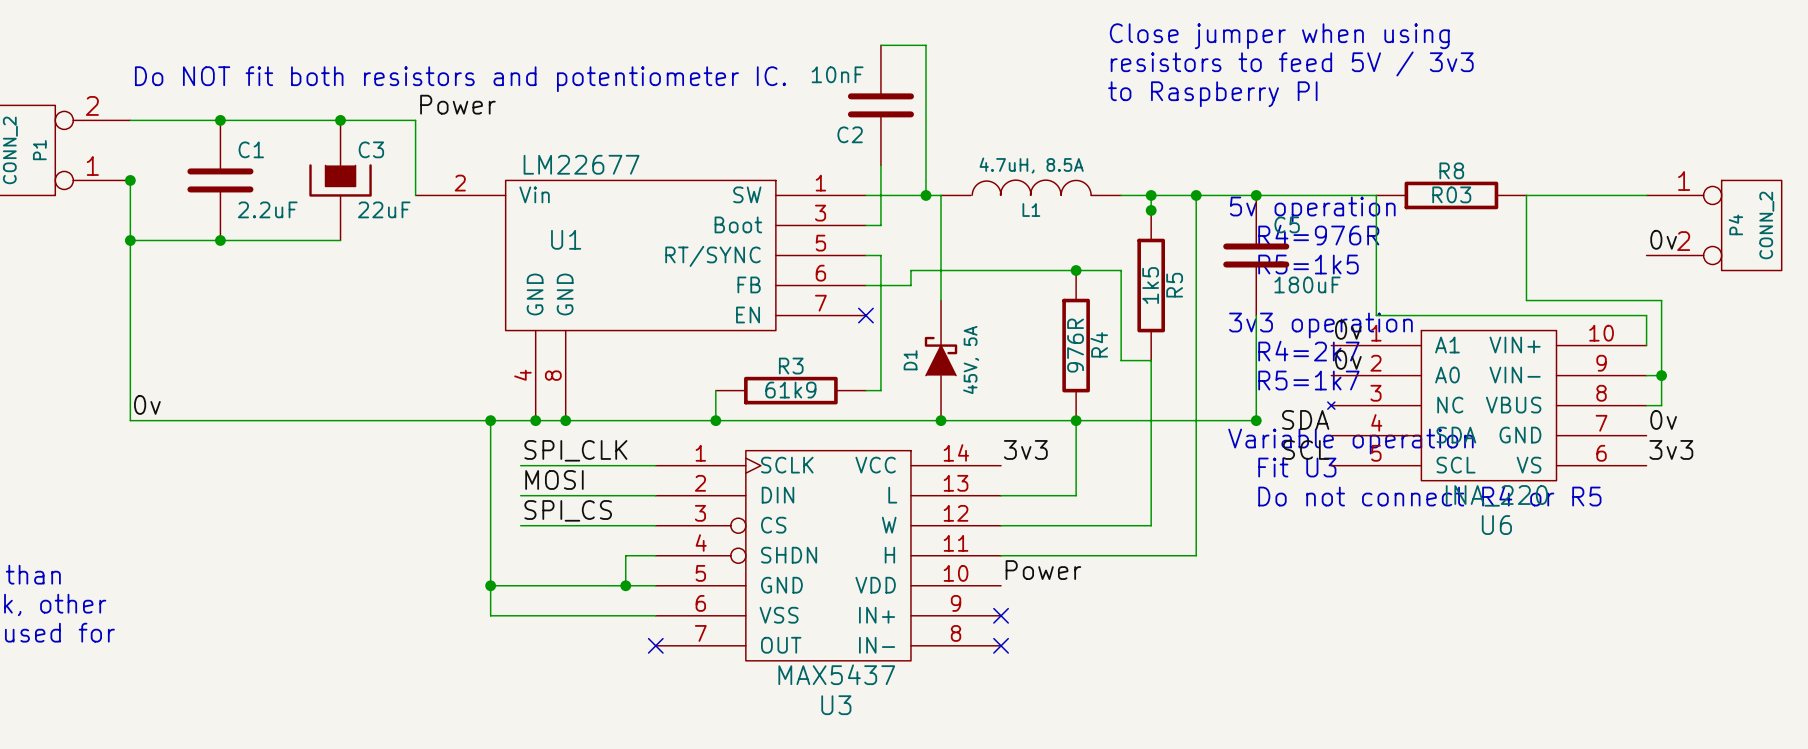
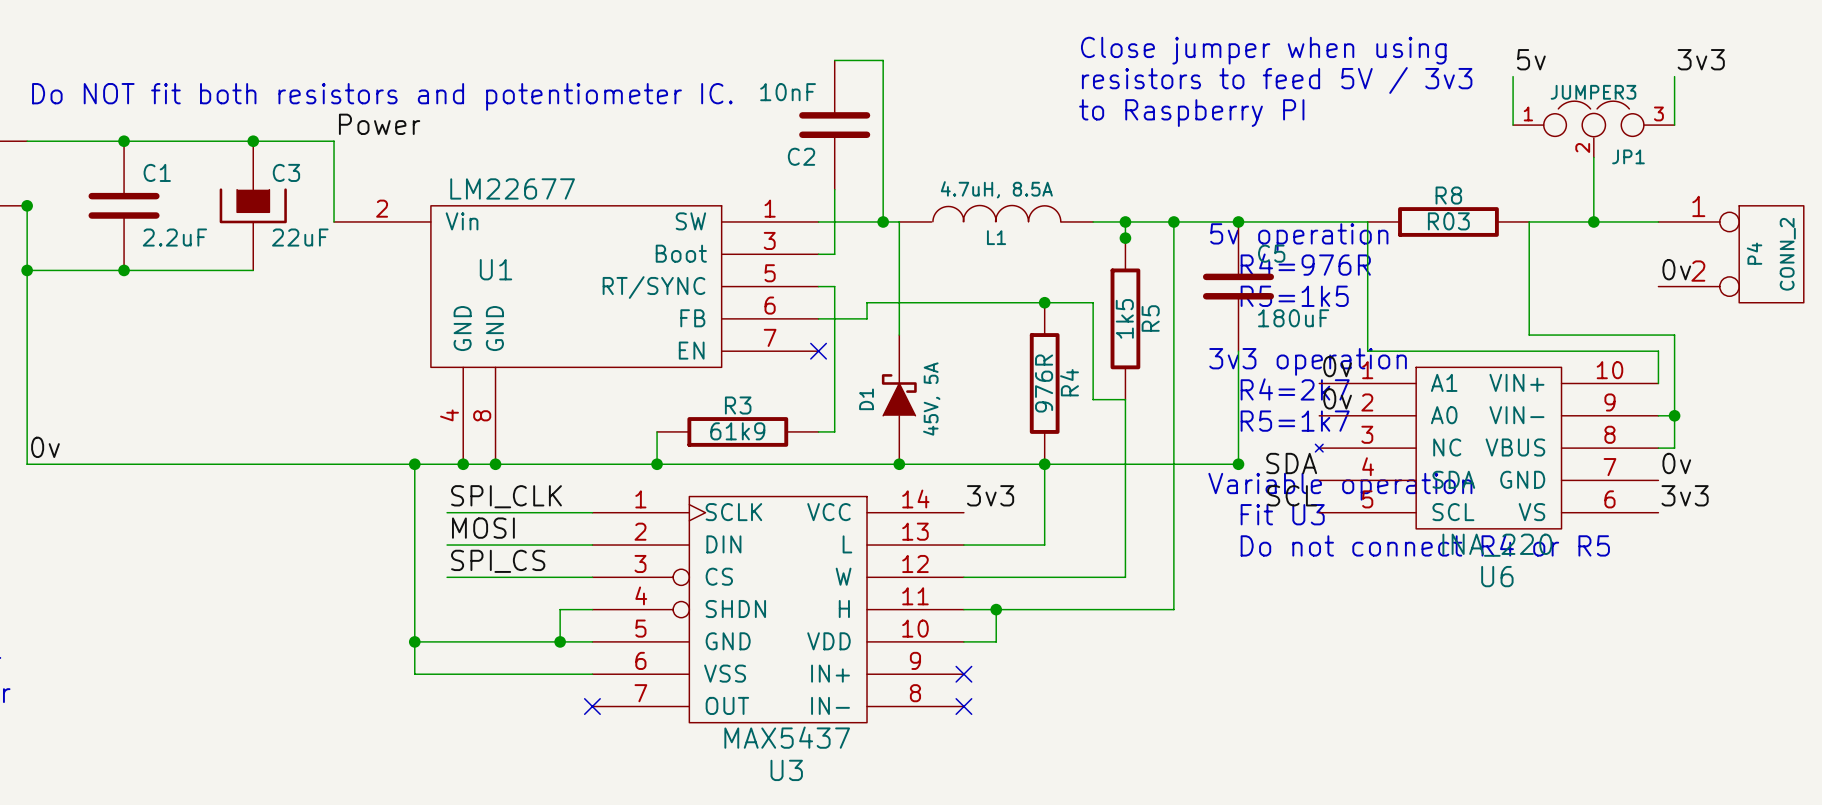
label: none -> 5v (1531, 59)
label: none -> 3v3 (1701, 59)
wire: none -> (1513, 76) (1513, 125)
wire: none -> (1674, 76) (1674, 125)
JP1: none -> JUMPER3 (1593, 129)
wire: none -> (1593, 157) (1593, 221)
junction: none -> (1593, 221)
wire: none -> (996, 609) (996, 641) (963, 641)
junction: none -> (996, 609)
label: Power (1043, 570) -> none

